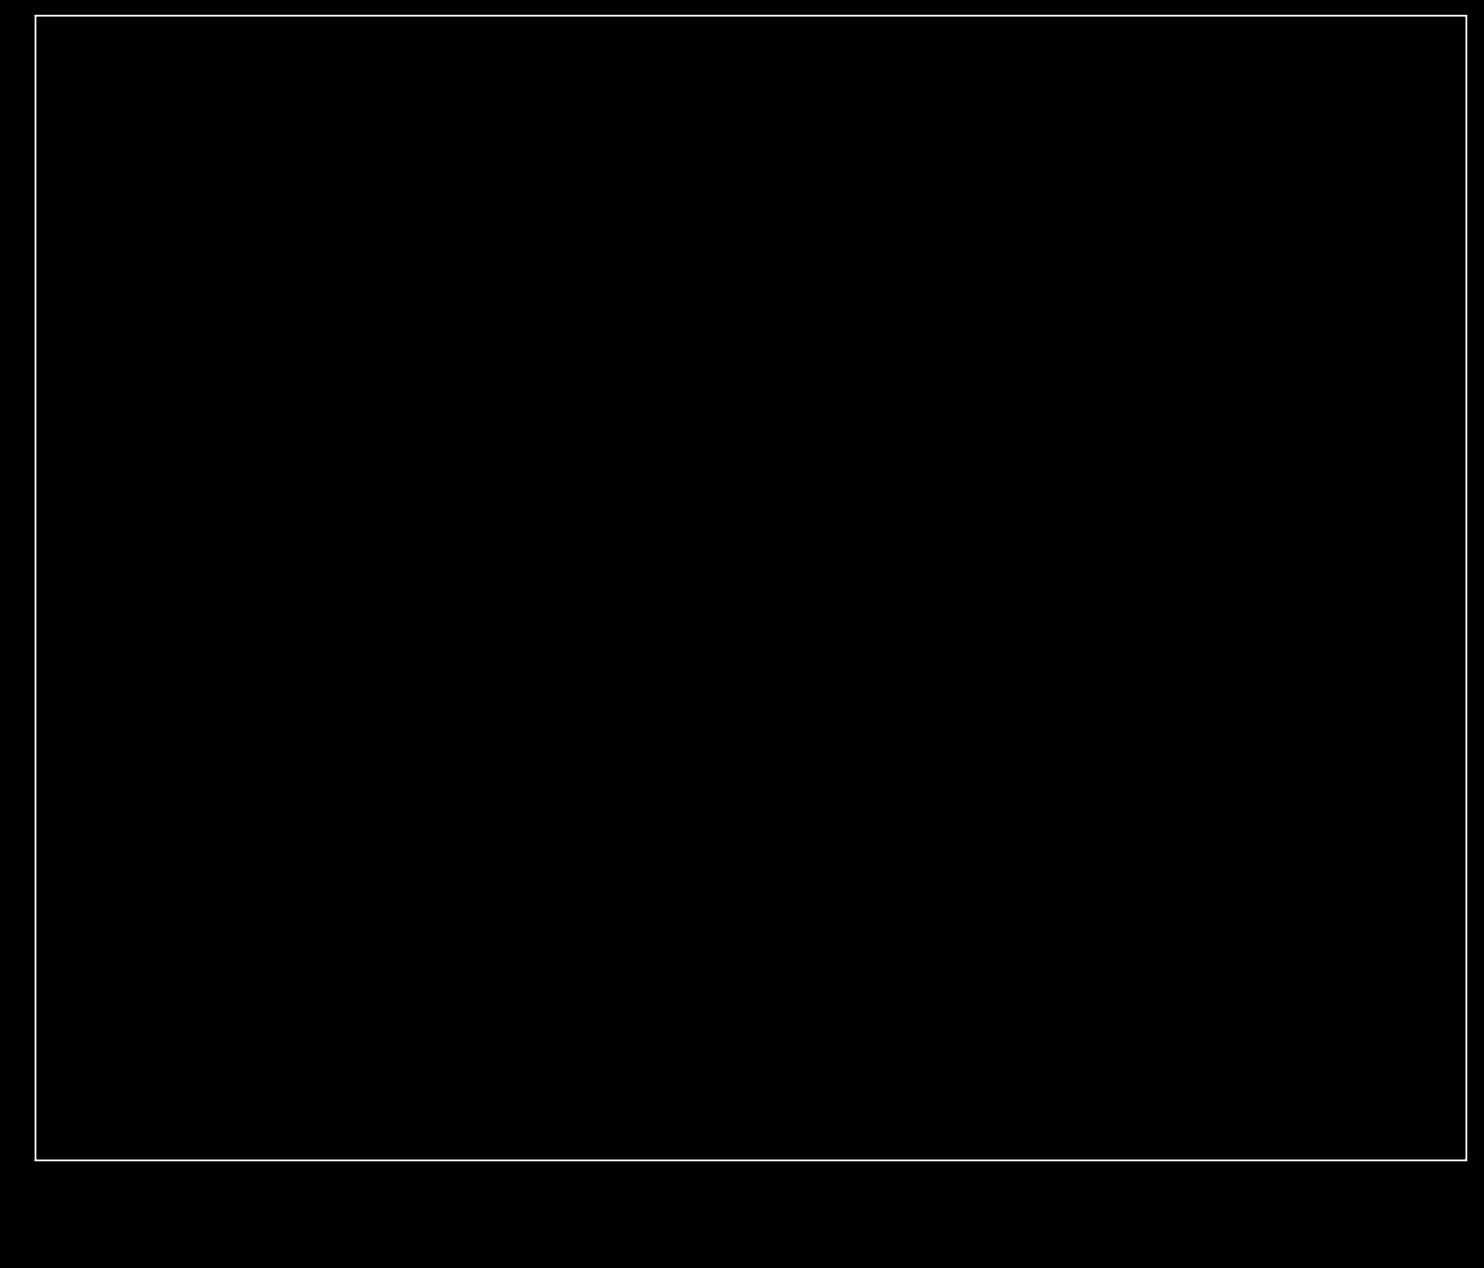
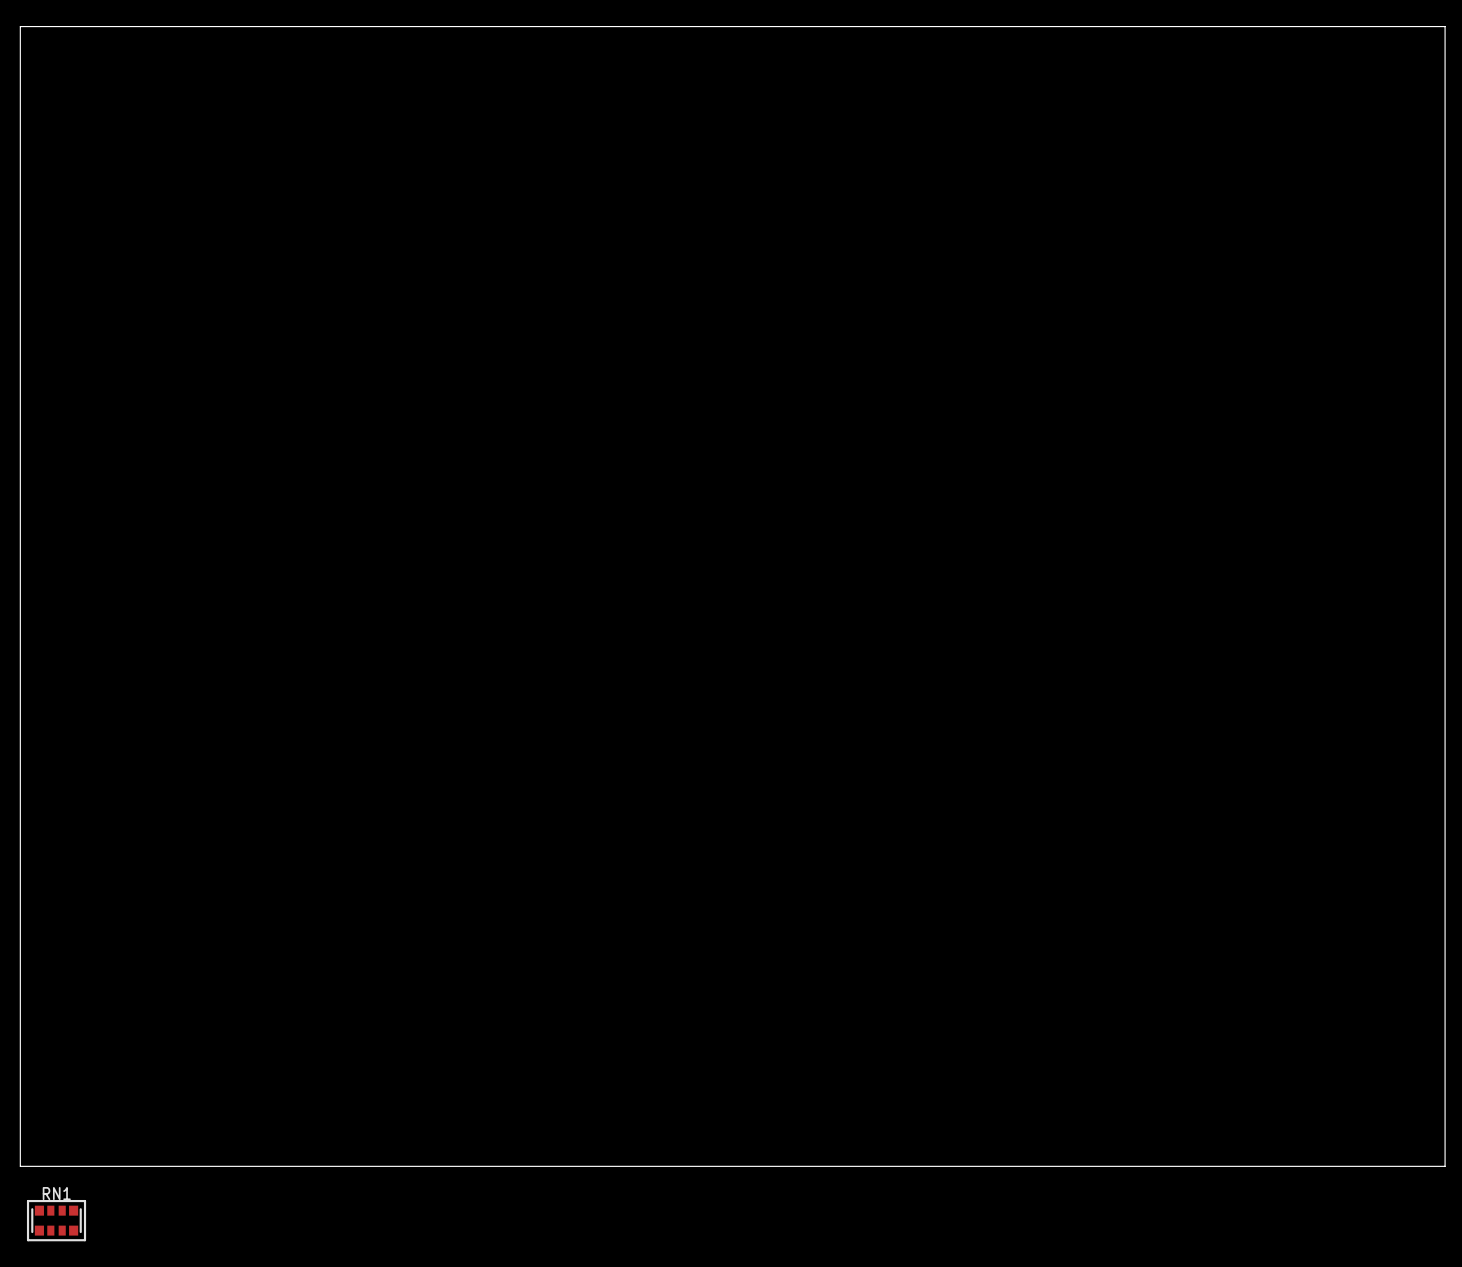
RN1: none -> (56, 1220)

